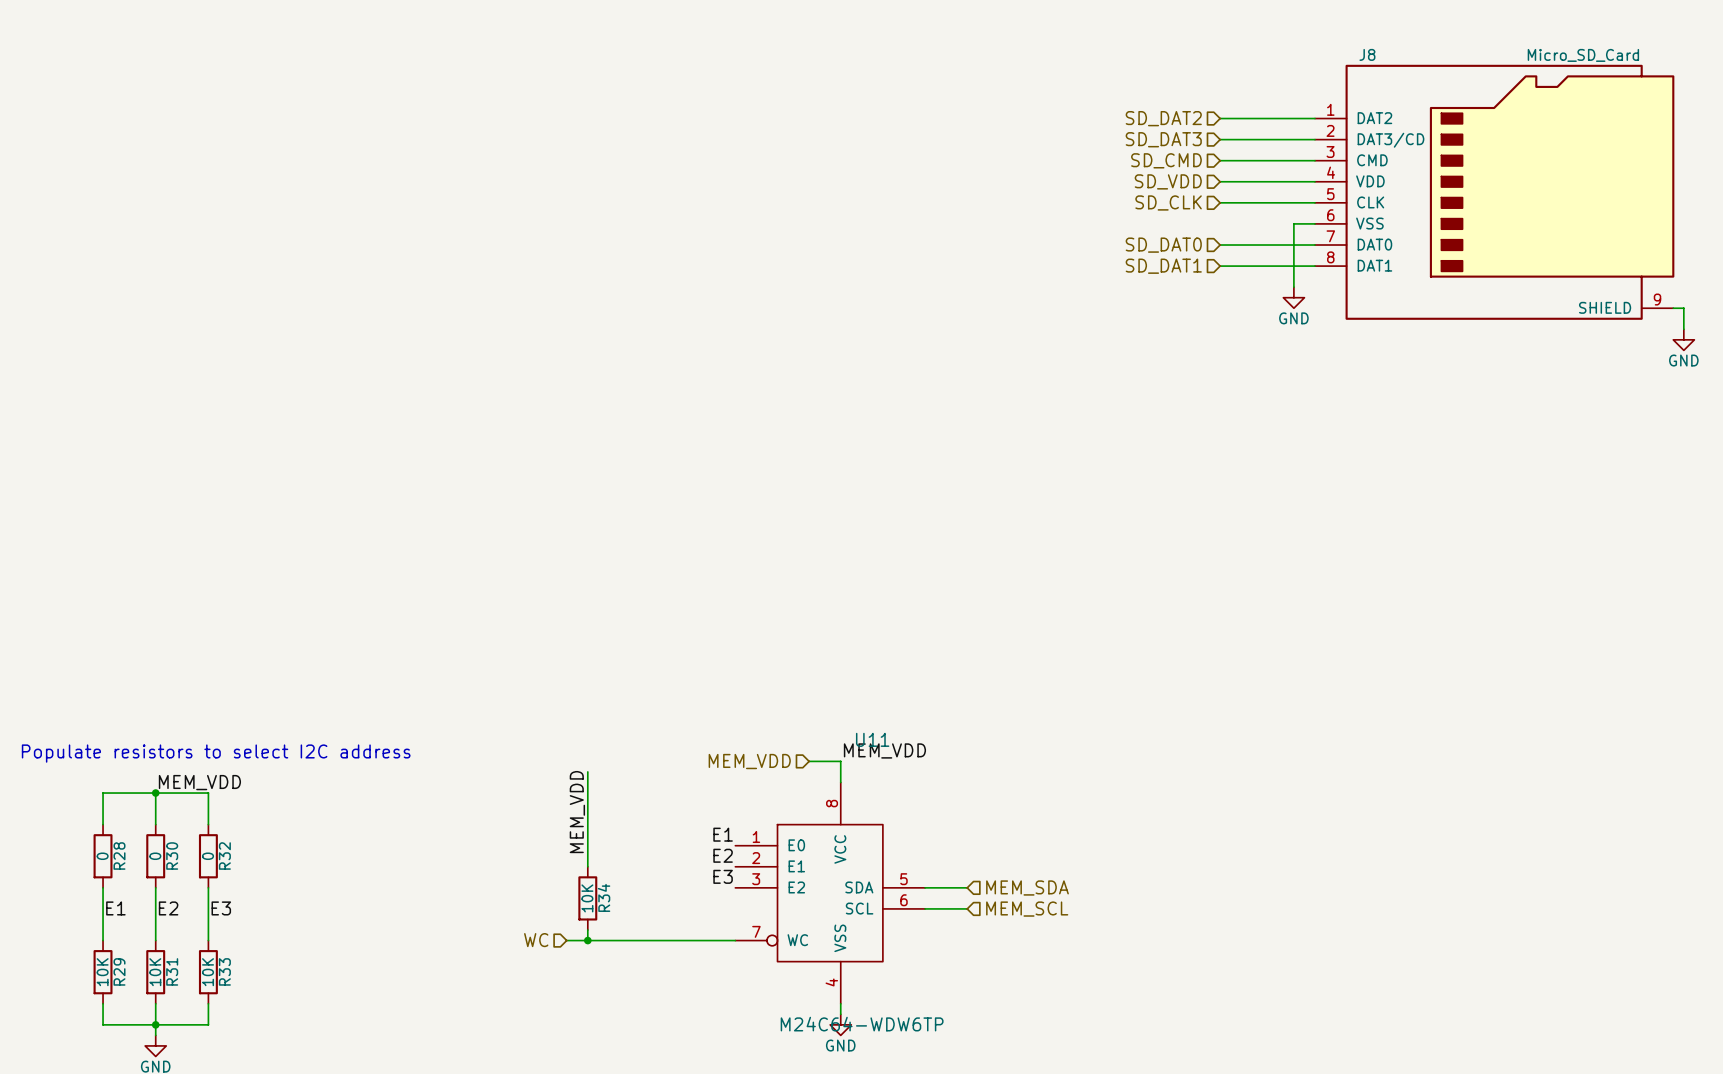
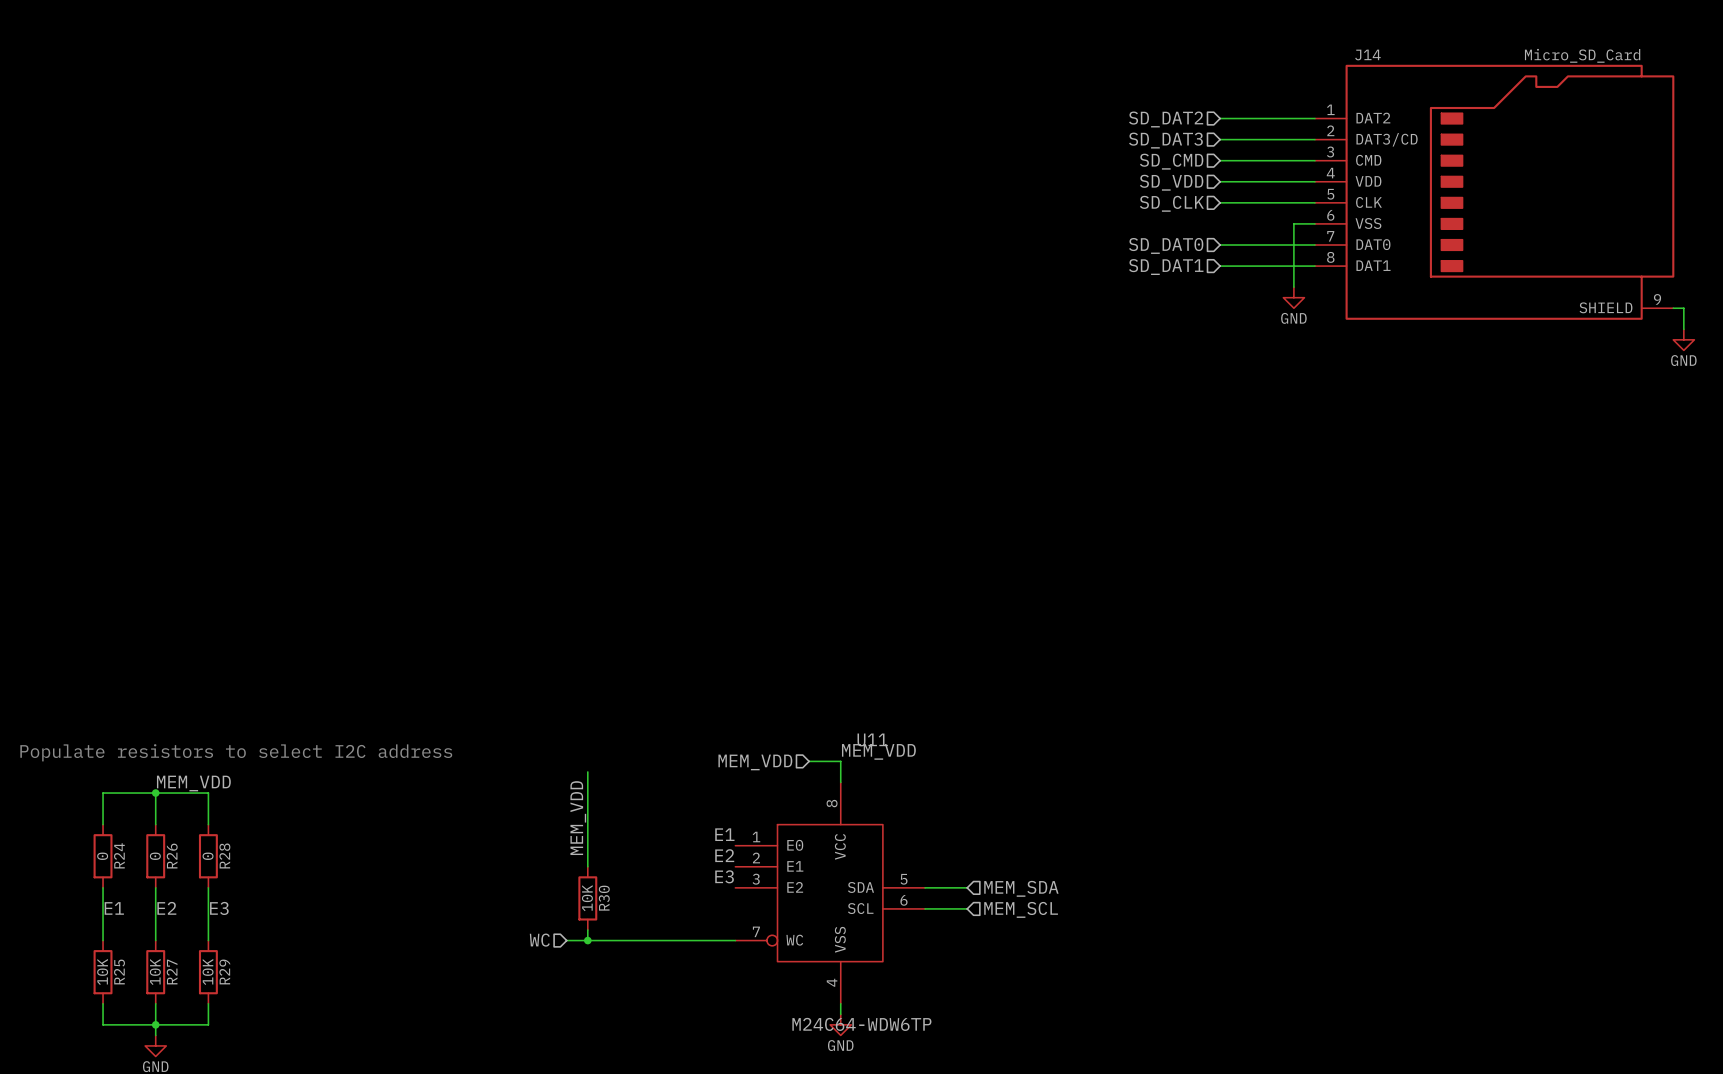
J8 name: J8 (1367, 54) -> J14 (1367, 55)
R28 name: R28 (119, 856) -> R24 (119, 855)
R30 name: R30 (172, 856) -> R26 (172, 856)
R32 name: R32 (224, 856) -> R28 (224, 855)
R34 name: R34 (604, 897) -> R30 (604, 898)
R29 name: R29 (119, 971) -> R25 (119, 972)
R31 name: R31 (172, 971) -> R27 (172, 972)
R33 name: R33 (224, 971) -> R29 (224, 971)

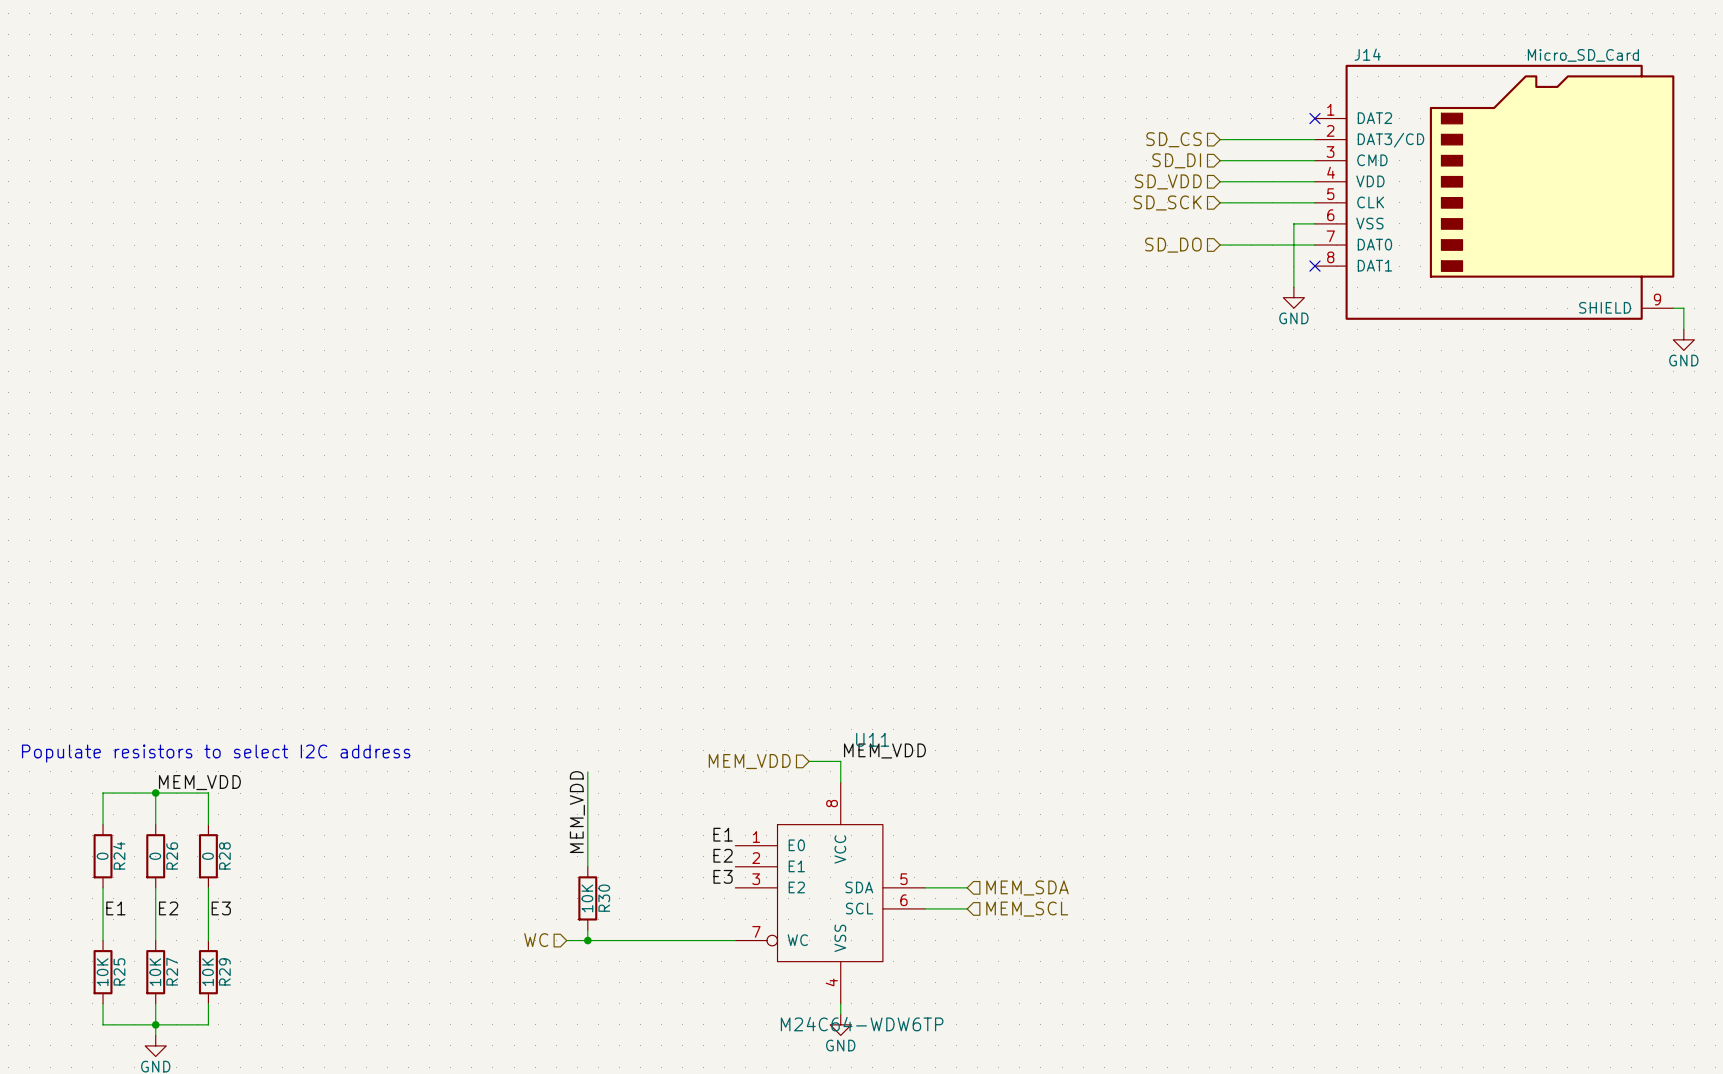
wire: (1220, 118) (1314, 118) -> none
no-connect mark: none -> (1314, 118)
hierarchical label: SD_DAT2 (1166, 119) -> none
hierarchical label: SD_DAT3 (1165, 140) -> SD_CS (1173, 139)
hierarchical label: SD_CMD (1171, 161) -> SD_DI (1176, 160)
hierarchical label: SD_CLK (1171, 203) -> SD_SCK (1167, 202)
hierarchical label: SD_DAT0 (1166, 245) -> SD_DO (1173, 245)
wire: (1220, 266) (1314, 266) -> none
no-connect mark: none -> (1314, 266)
hierarchical label: SD_DAT1 (1166, 267) -> none

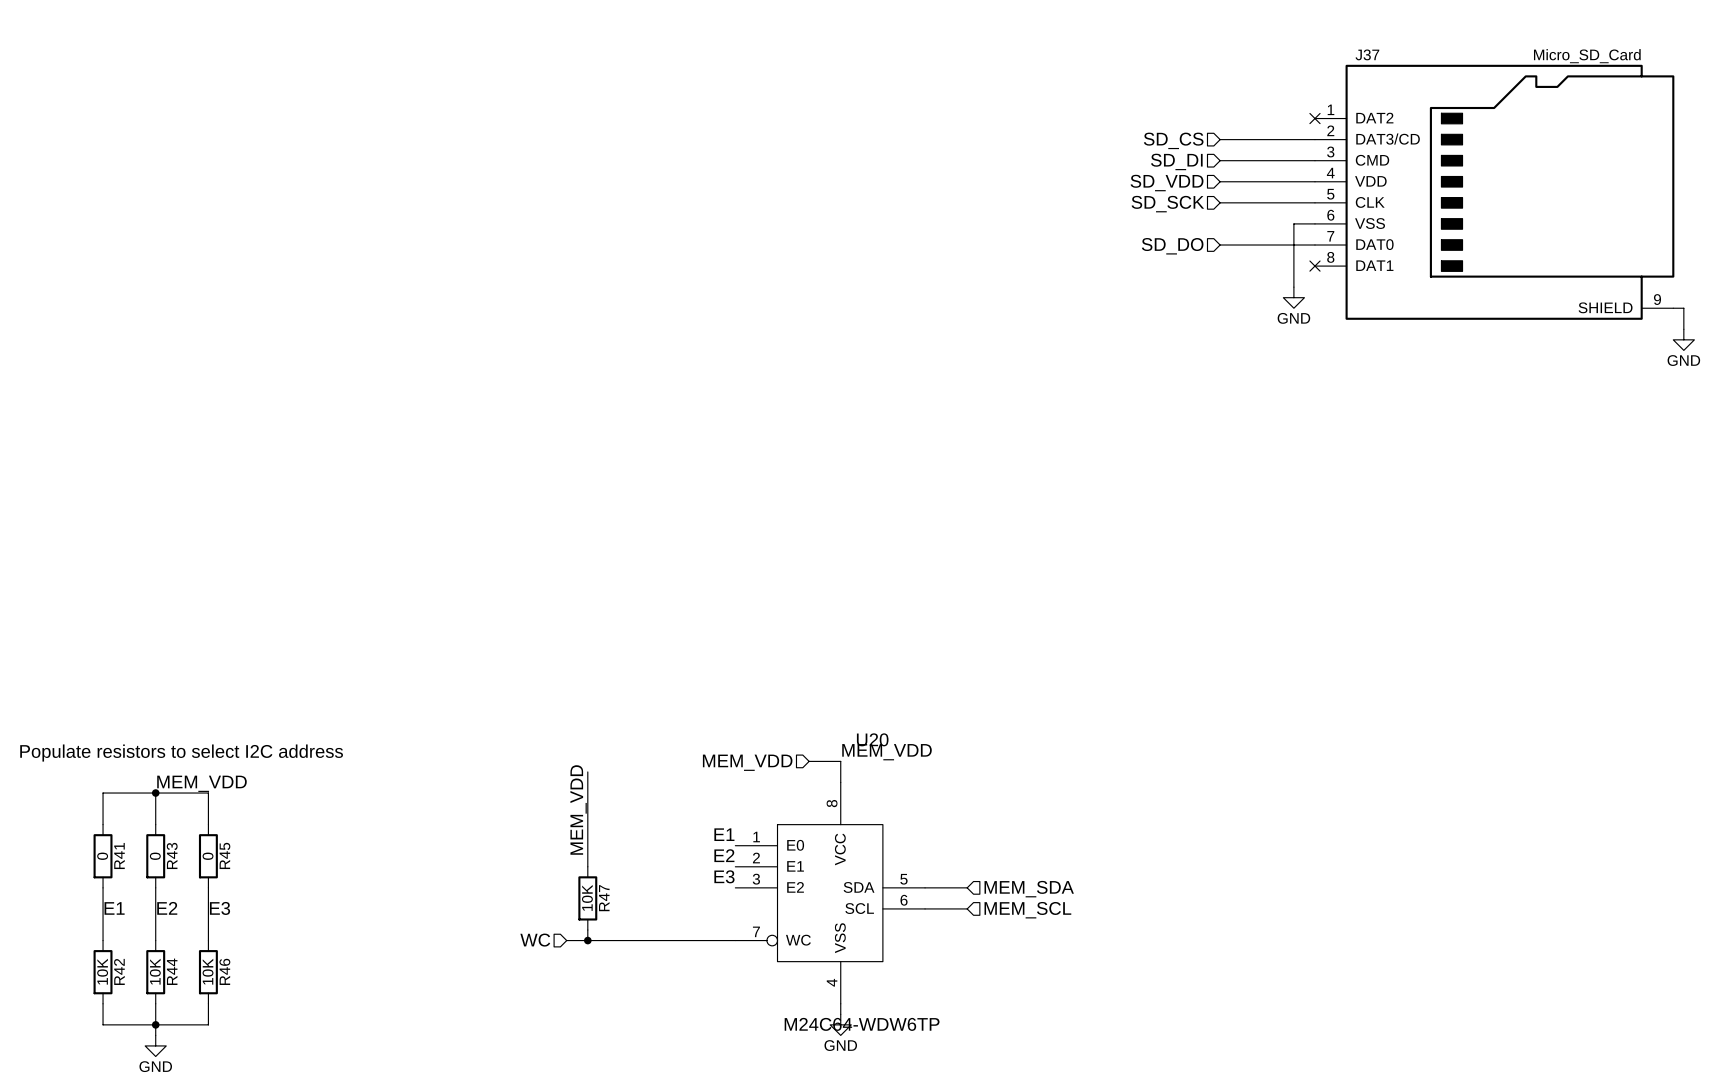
J14 name: J14 (1367, 54) -> J37 (1367, 54)
U11 name: U11 (872, 739) -> U20 (872, 739)
R24 name: R24 (119, 855) -> R41 (119, 856)
R26 name: R26 (172, 856) -> R43 (172, 855)
R28 name: R28 (224, 856) -> R45 (224, 855)
R30 name: R30 (604, 898) -> R47 (604, 898)
R25 name: R25 (119, 971) -> R42 (119, 971)
R27 name: R27 (172, 971) -> R44 (172, 971)
R29 name: R29 (224, 971) -> R46 (224, 971)

